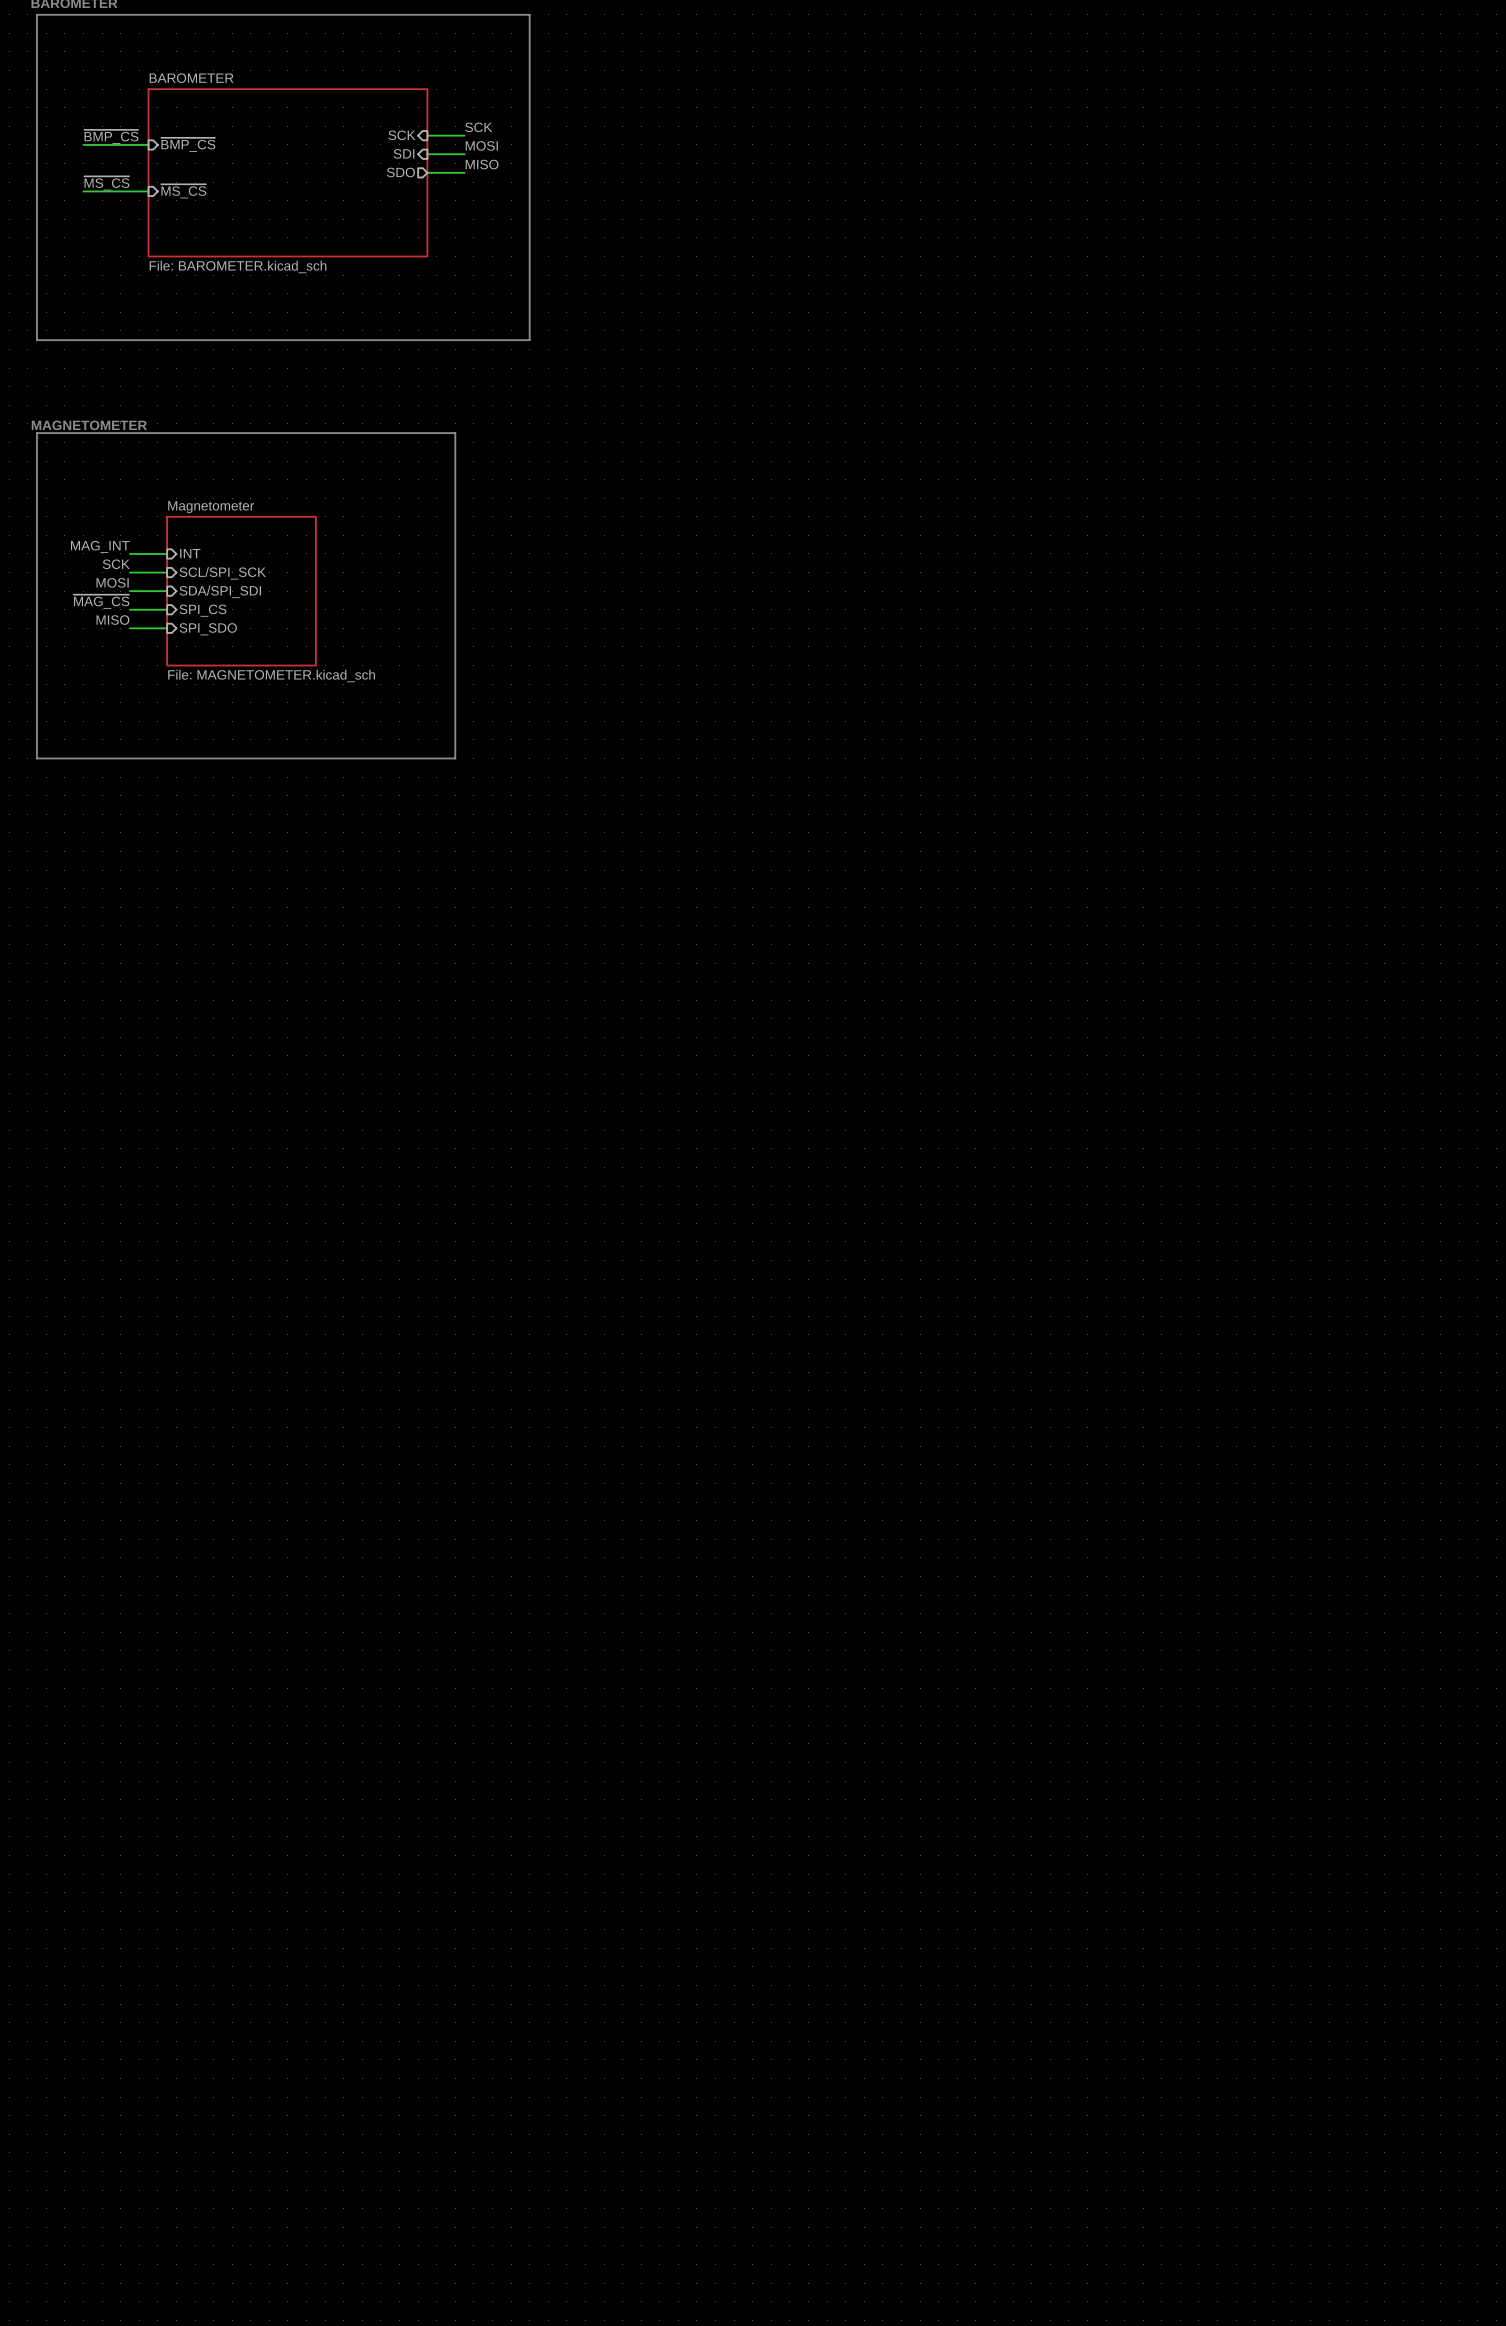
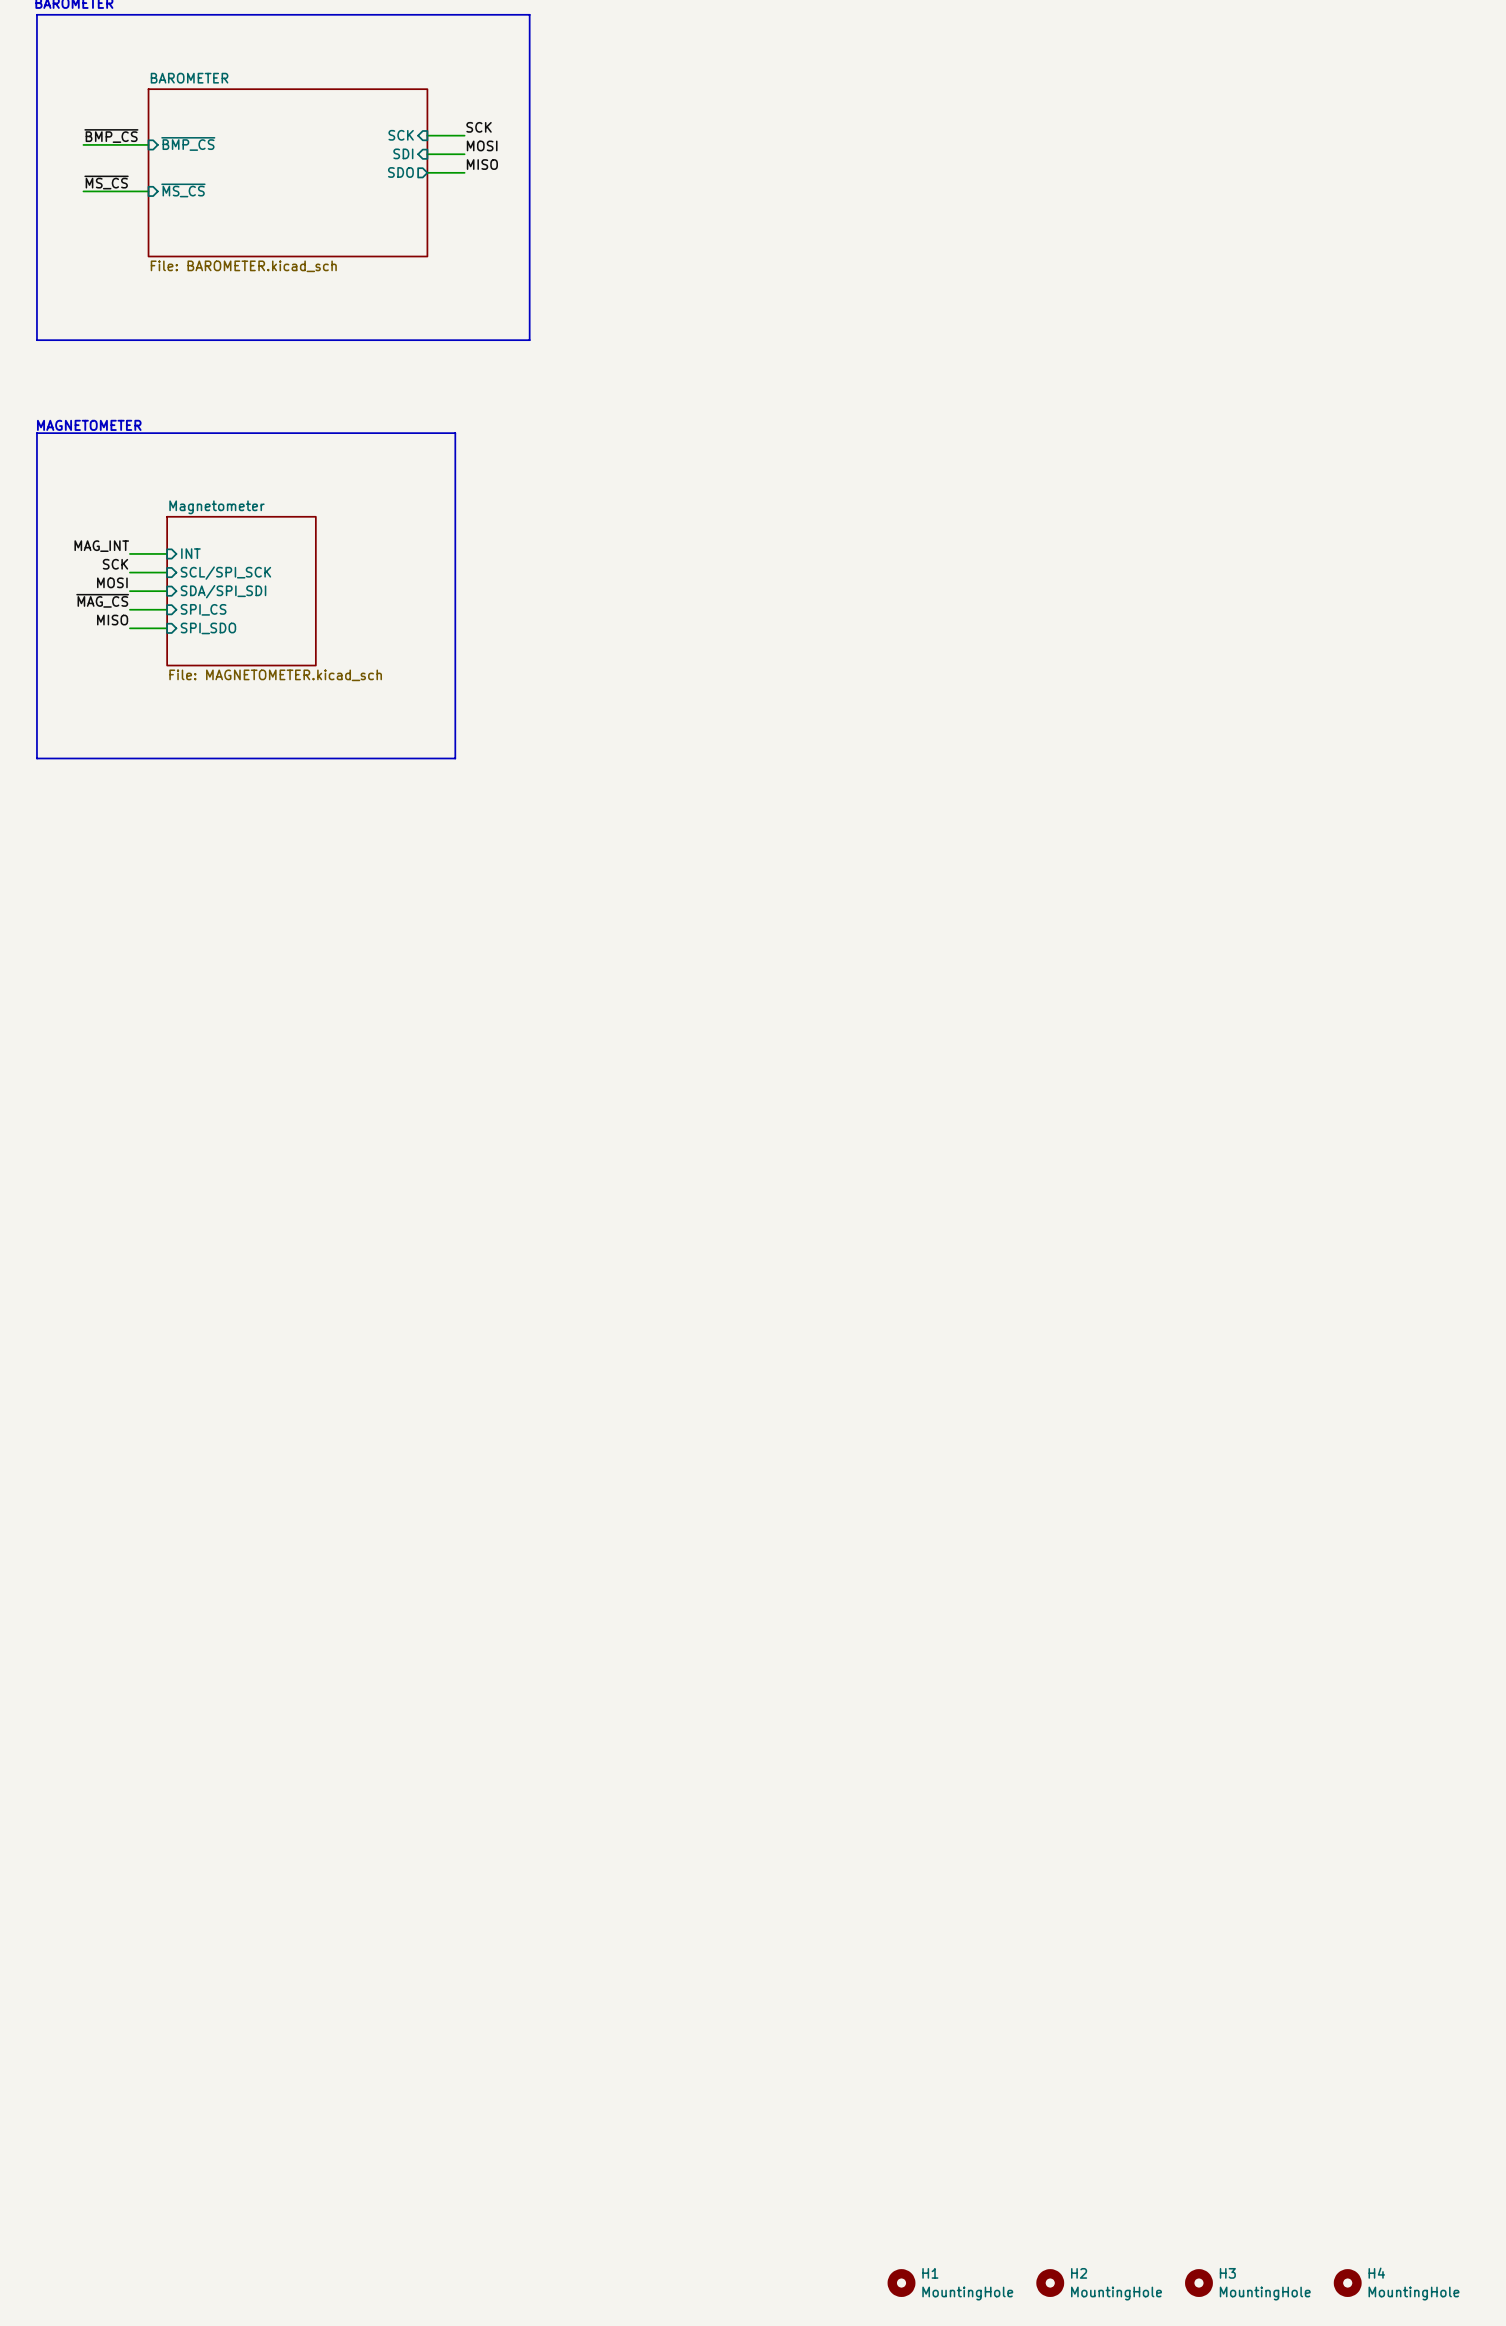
H1: none -> MountingHole (901, 2283)
H2: none -> MountingHole (1050, 2283)
H3: none -> MountingHole (1198, 2283)
H4: none -> MountingHole (1347, 2283)

